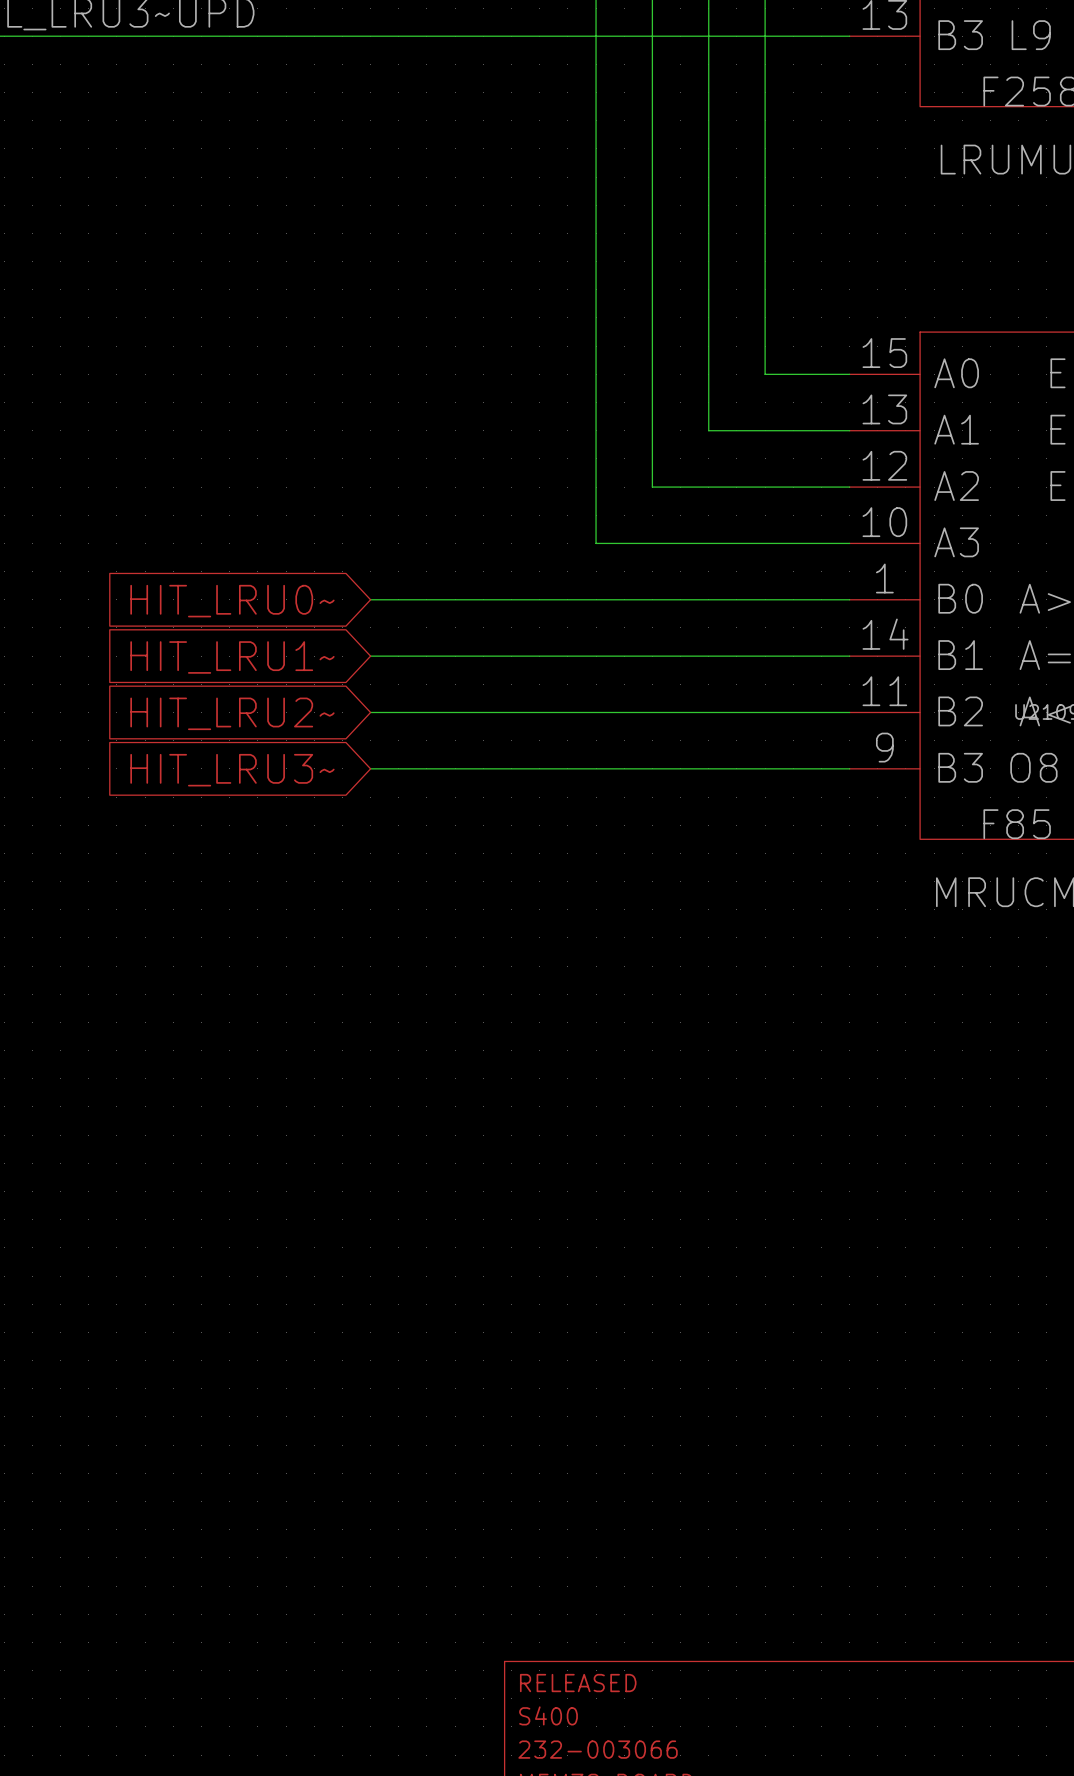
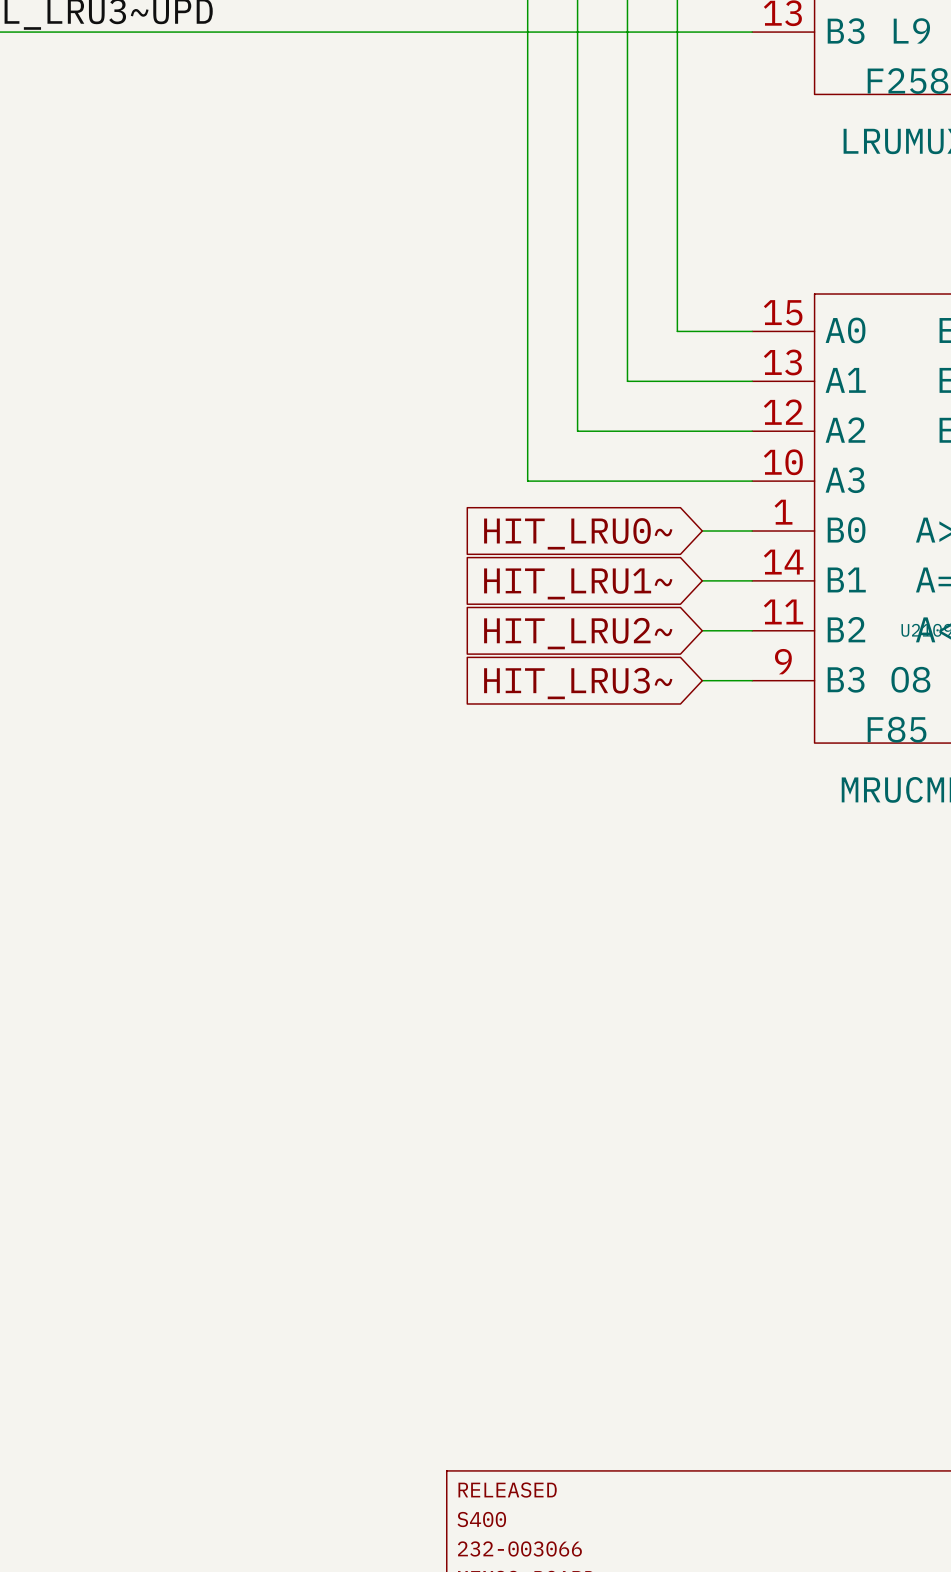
wire: (370, 599) (793, 599) -> none
global label: HIT_LRU0~ (232, 601) -> none
global label: none -> HIT_LRU0~ (578, 533)
wire: (370, 656) (793, 656) -> none
global label: HIT_LRU1~ (232, 657) -> none
global label: none -> HIT_LRU1~ (578, 583)
wire: (370, 712) (793, 712) -> none
global label: HIT_LRU2~ (232, 713) -> none
global label: none -> HIT_LRU2~ (578, 633)
wire: (370, 768) (793, 768) -> none
global label: HIT_LRU3~ (232, 770) -> none
global label: none -> HIT_LRU3~ (578, 683)

